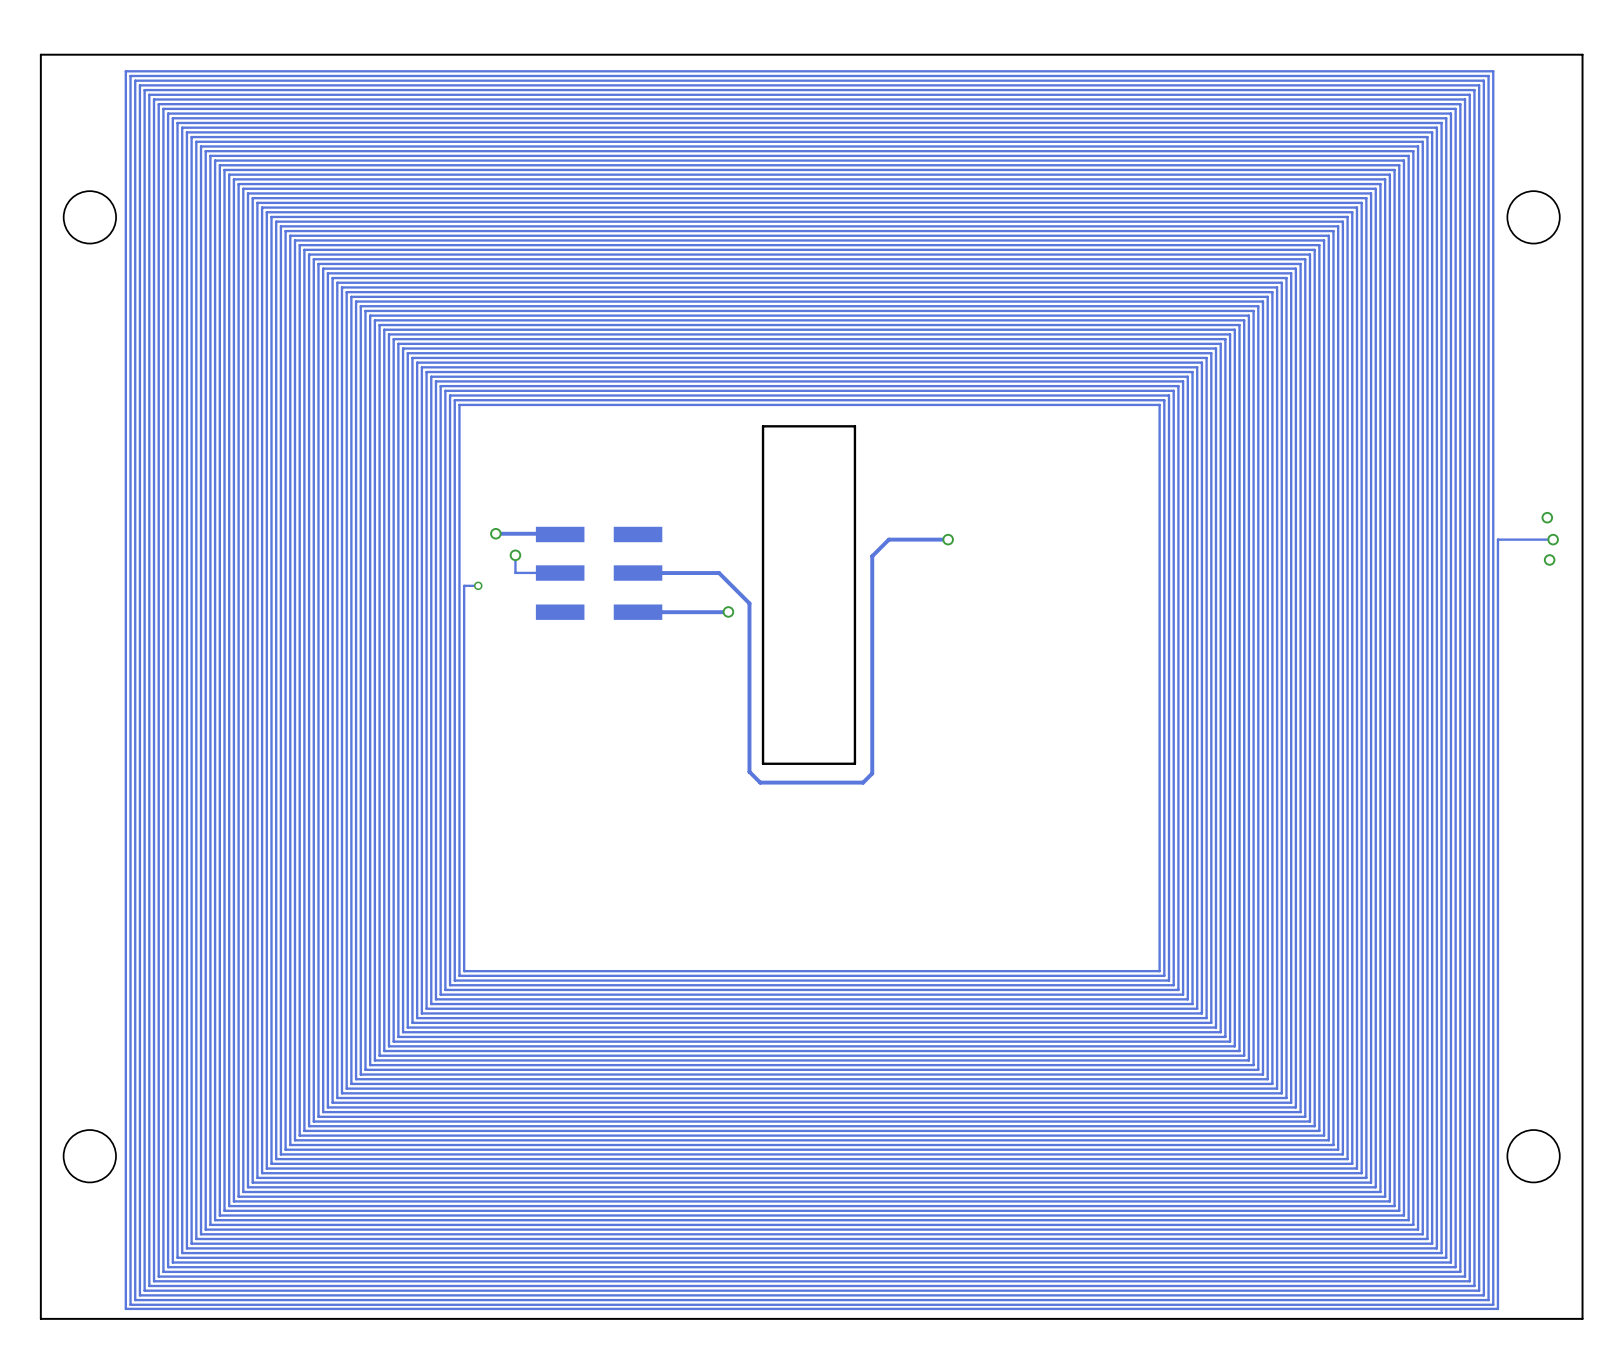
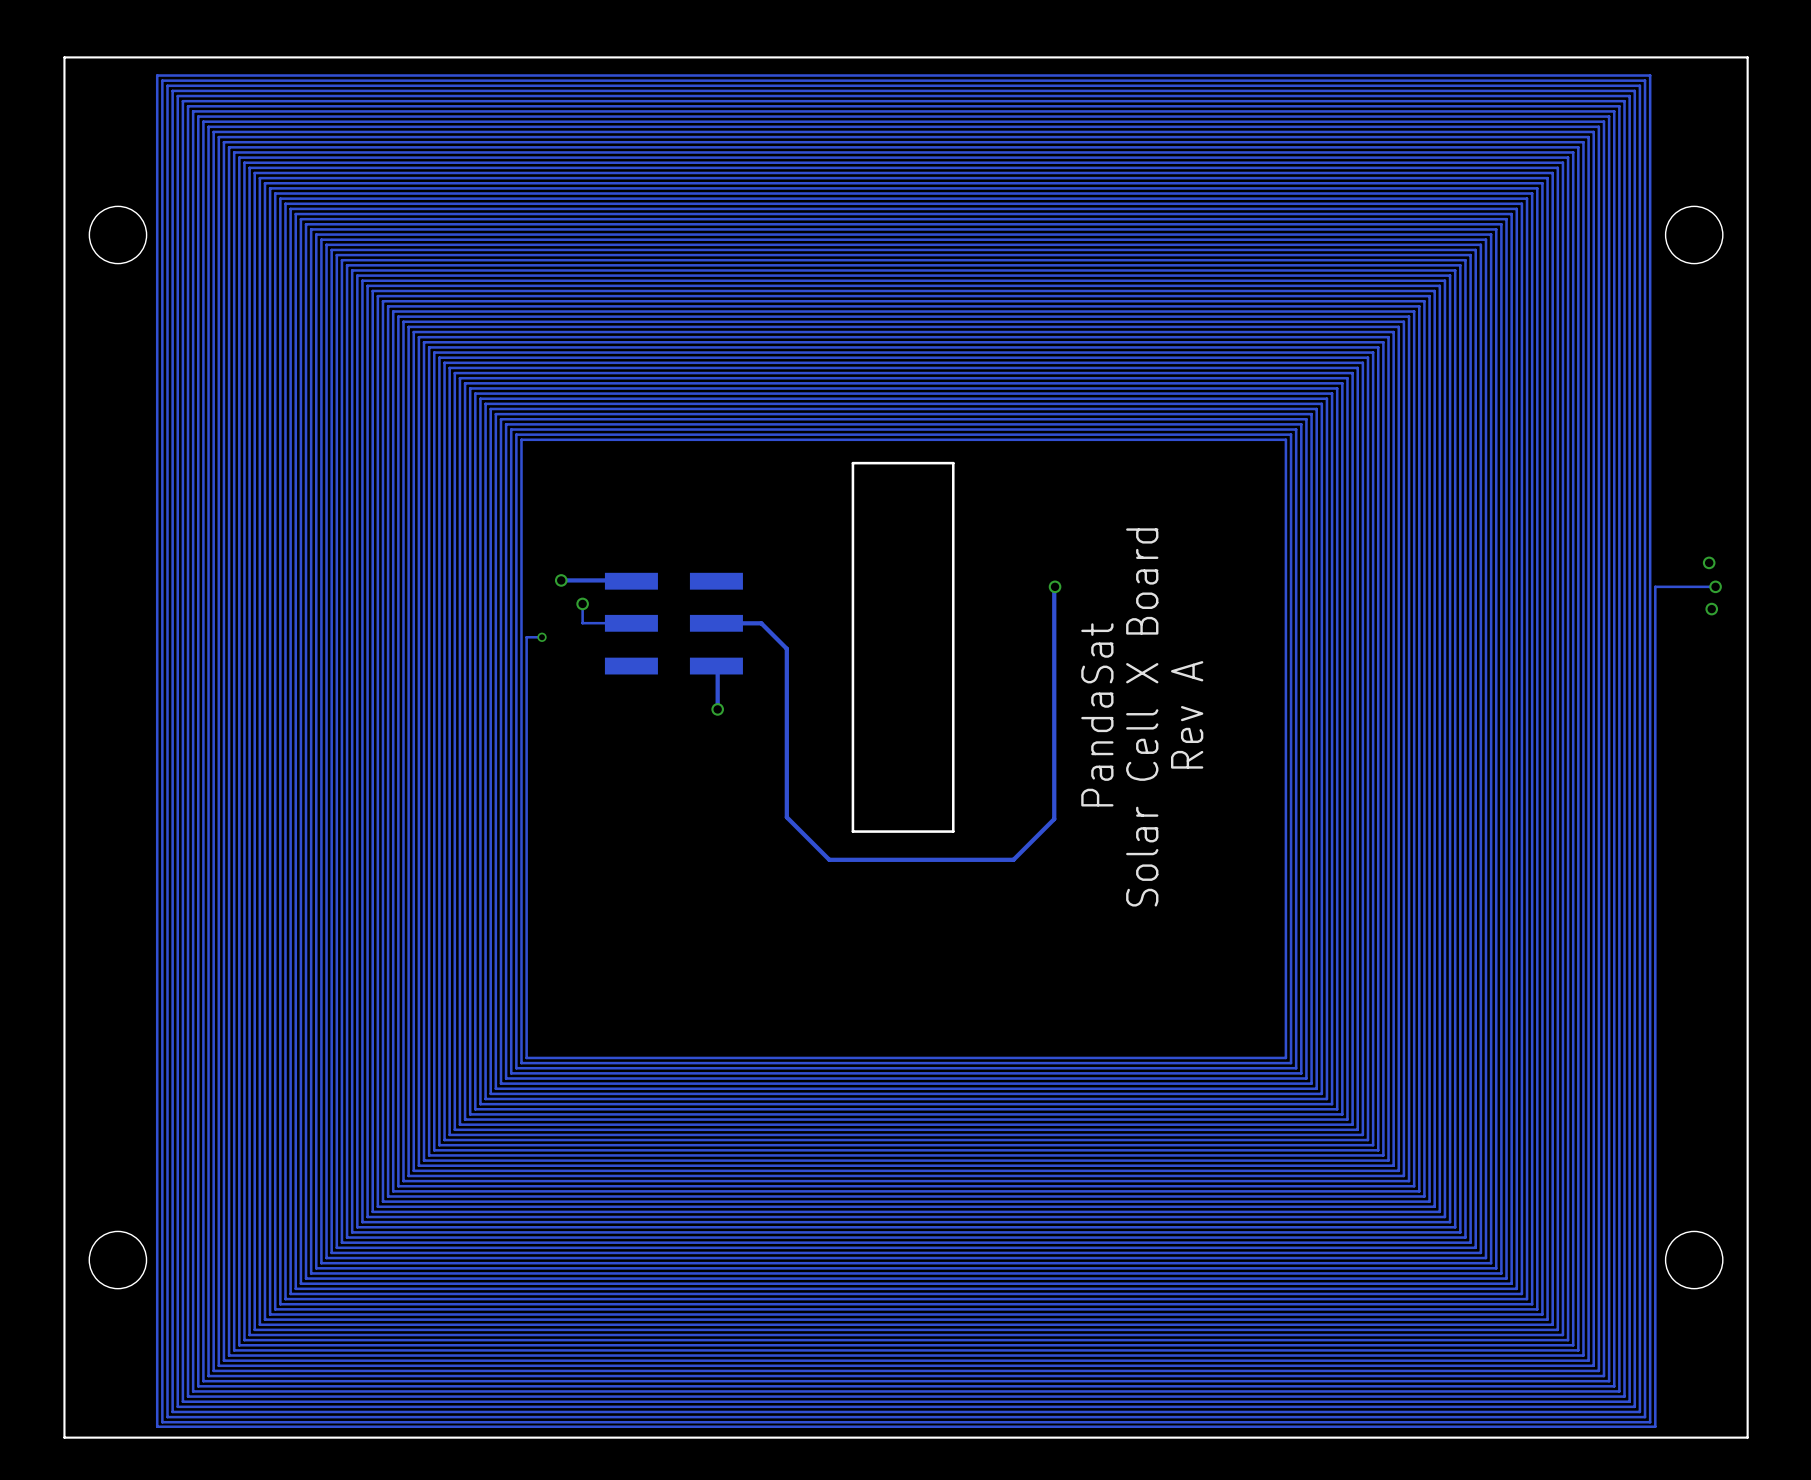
track: (947, 539) (888, 539) (872, 556) (872, 773) (863, 782) (760, 782) (749, 771) (749, 603) (719, 573) (679, 573) -> (1054, 586) (1054, 819) (1013, 859) (829, 859) (786, 817) (786, 648) (761, 623)
via: (728, 611) -> none
track: (728, 612) (639, 612) -> (717, 709) (717, 666)
via: none -> (717, 709)
text: none -> PandaSat (1097, 714)
text: none -> Rev A (1187, 714)
text: none -> Solar Cell X Board (1142, 717)

